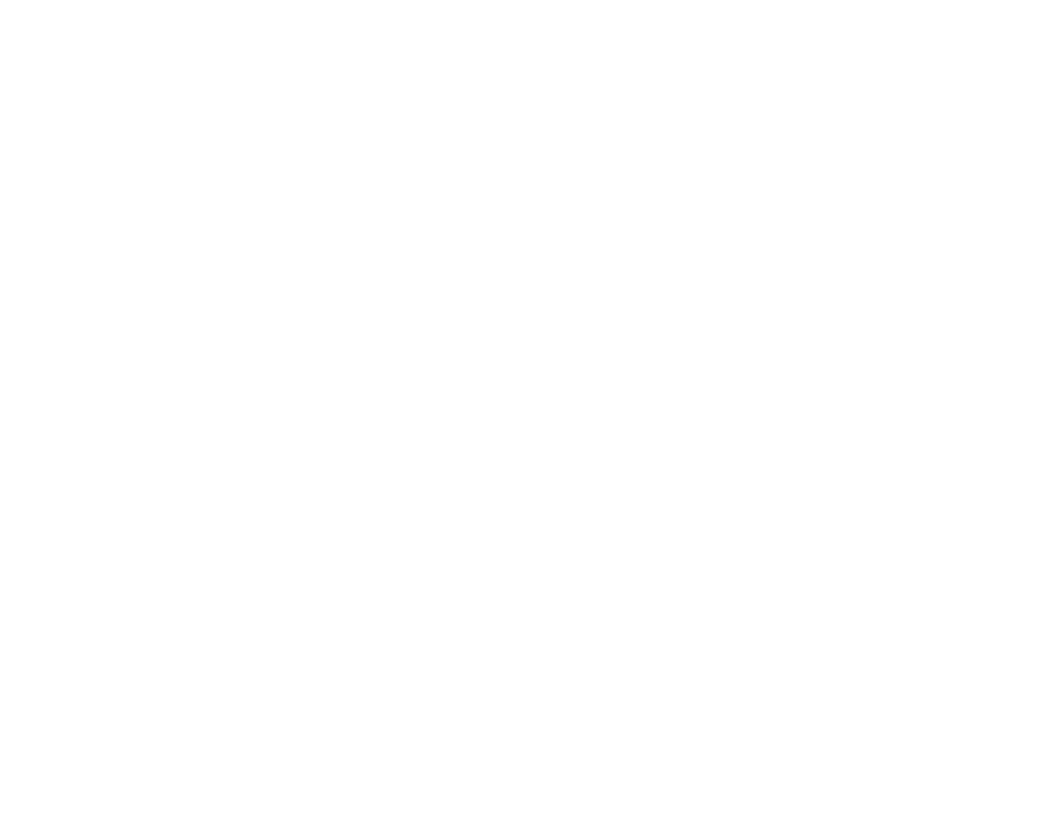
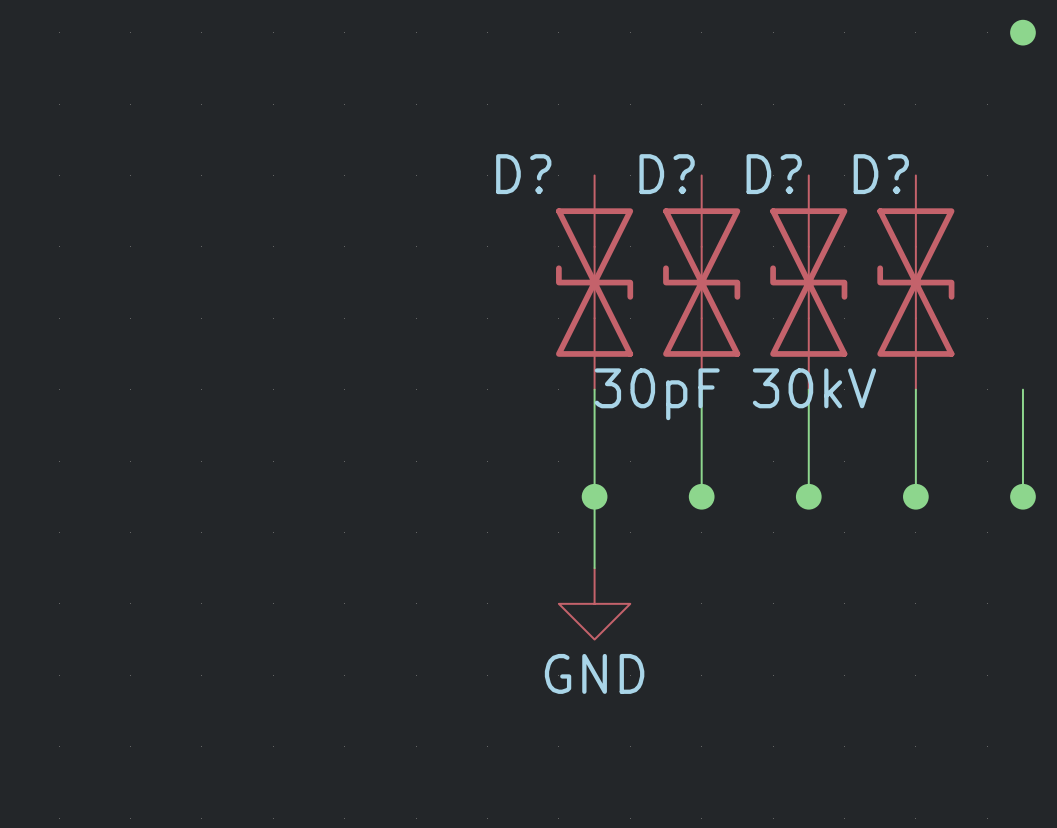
junction: none -> (1022, 32)
D?: none -> 30pF 30kV (594, 282)
D?: none -> (701, 282)
D?: none -> (808, 282)
D?: none -> (915, 282)
wire: none -> (594, 389) (594, 568)
wire: none -> (701, 389) (701, 496)
wire: none -> (808, 389) (808, 496)
wire: none -> (915, 389) (915, 496)
wire: none -> (1022, 389) (1022, 496)
junction: none -> (594, 496)
junction: none -> (701, 496)
junction: none -> (808, 496)
junction: none -> (915, 496)
junction: none -> (1022, 496)
power symbol: none -> GND (594, 603)

